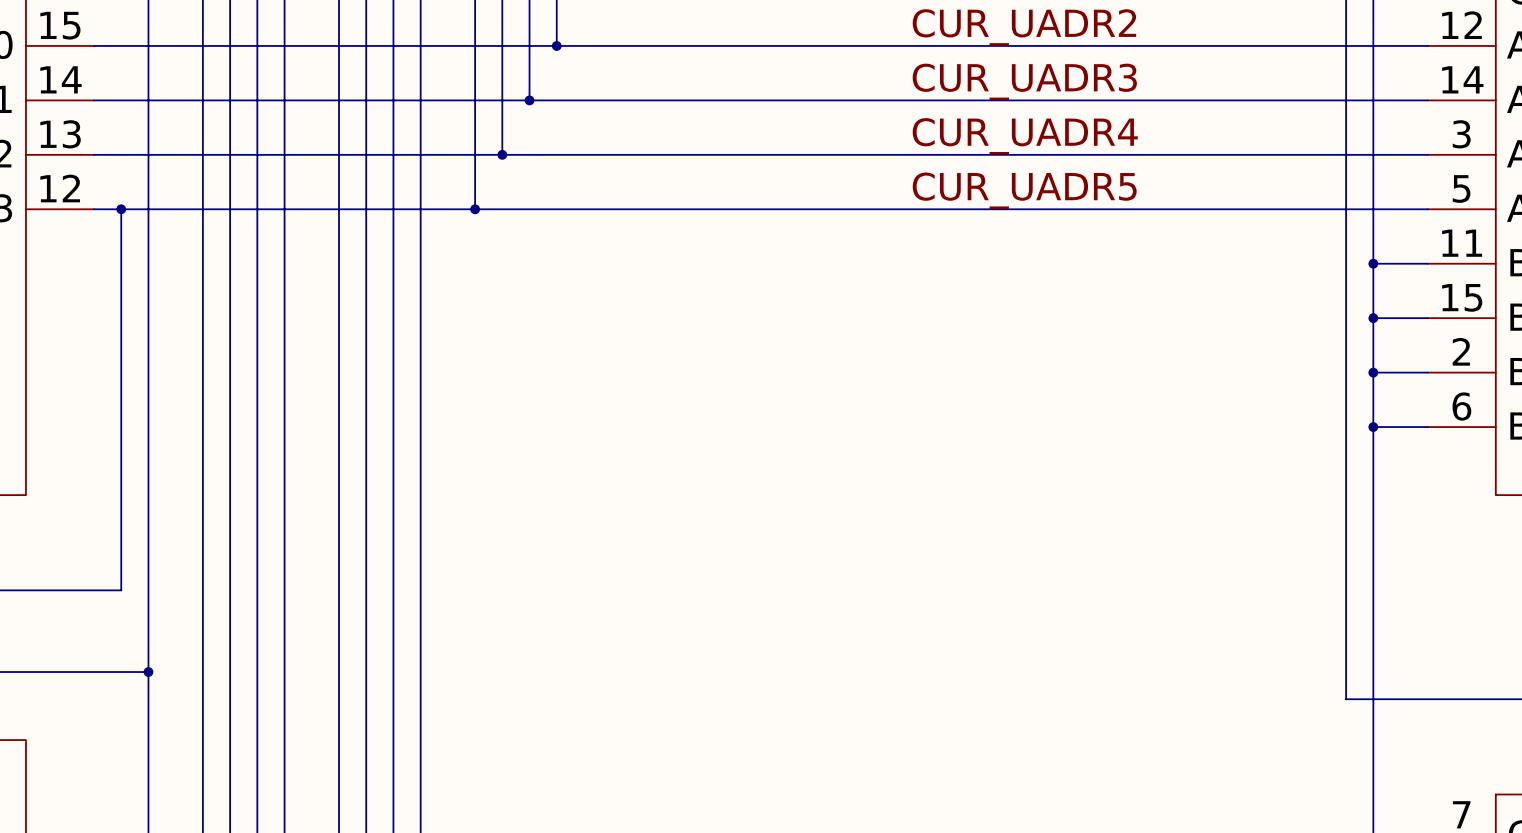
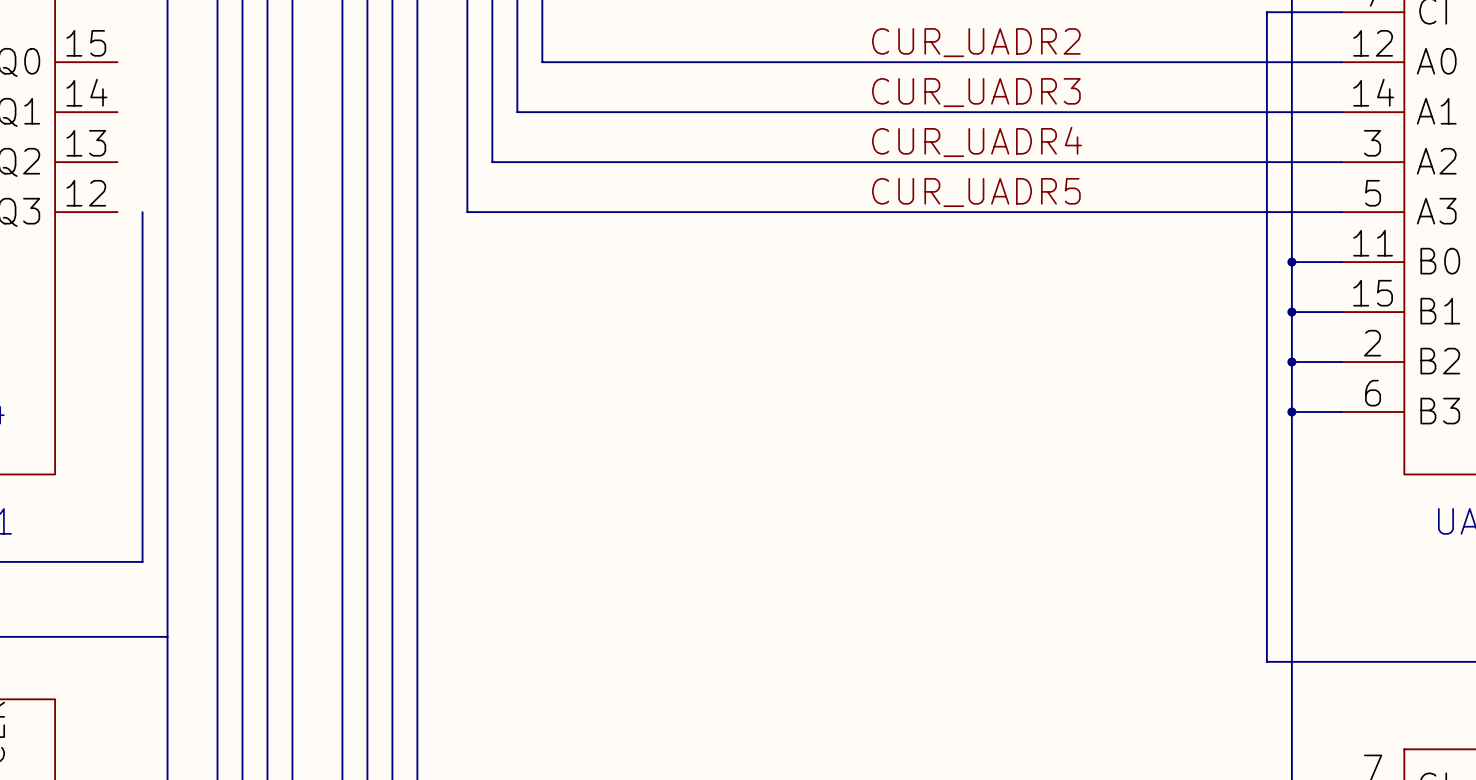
wire: (94, 45) (556, 45) -> none
junction: (556, 45) -> none
wire: (94, 100) (529, 100) -> none
junction: (529, 100) -> none
wire: (94, 154) (502, 154) -> none
junction: (502, 154) -> none
wire: (94, 209) (475, 209) -> none
junction: (121, 209) -> none
junction: (475, 209) -> none
junction: (148, 672) -> none

